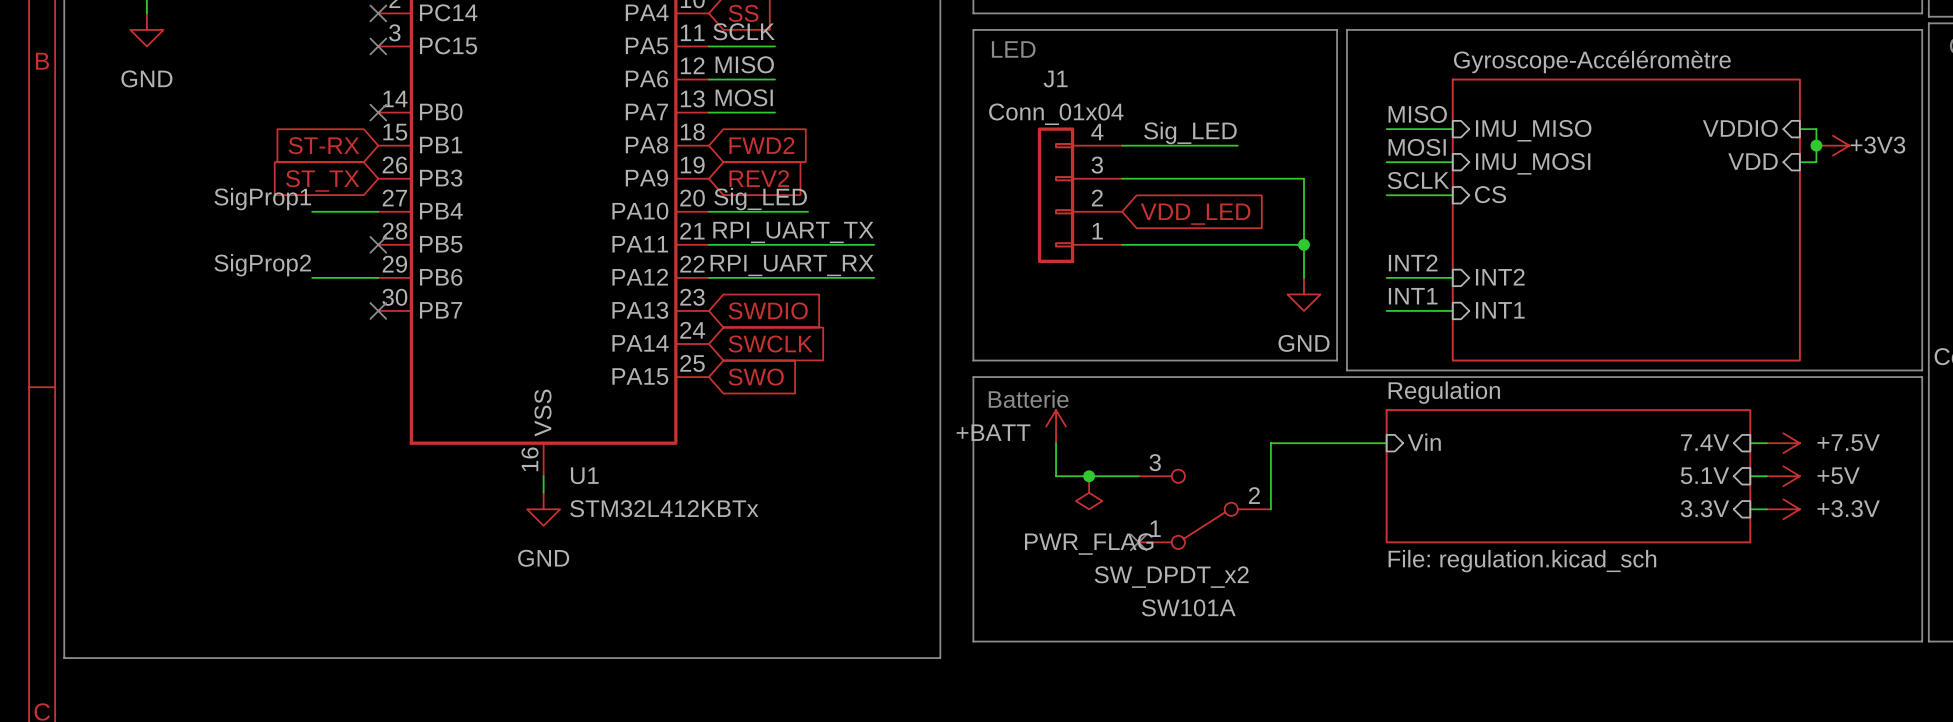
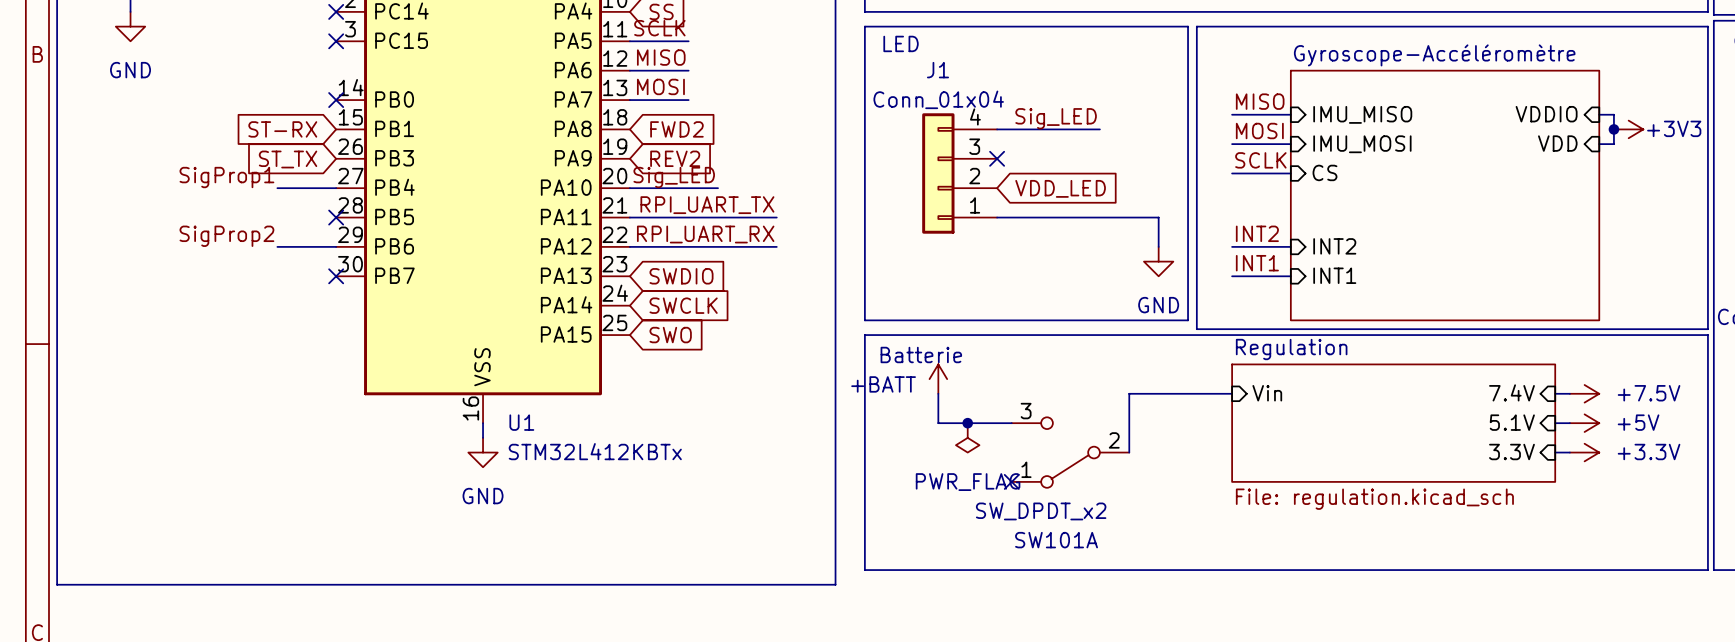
wire: (1122, 178) (1303, 178) (1303, 244) -> none
no-connect mark: none -> (997, 158)
junction: (1303, 244) -> none

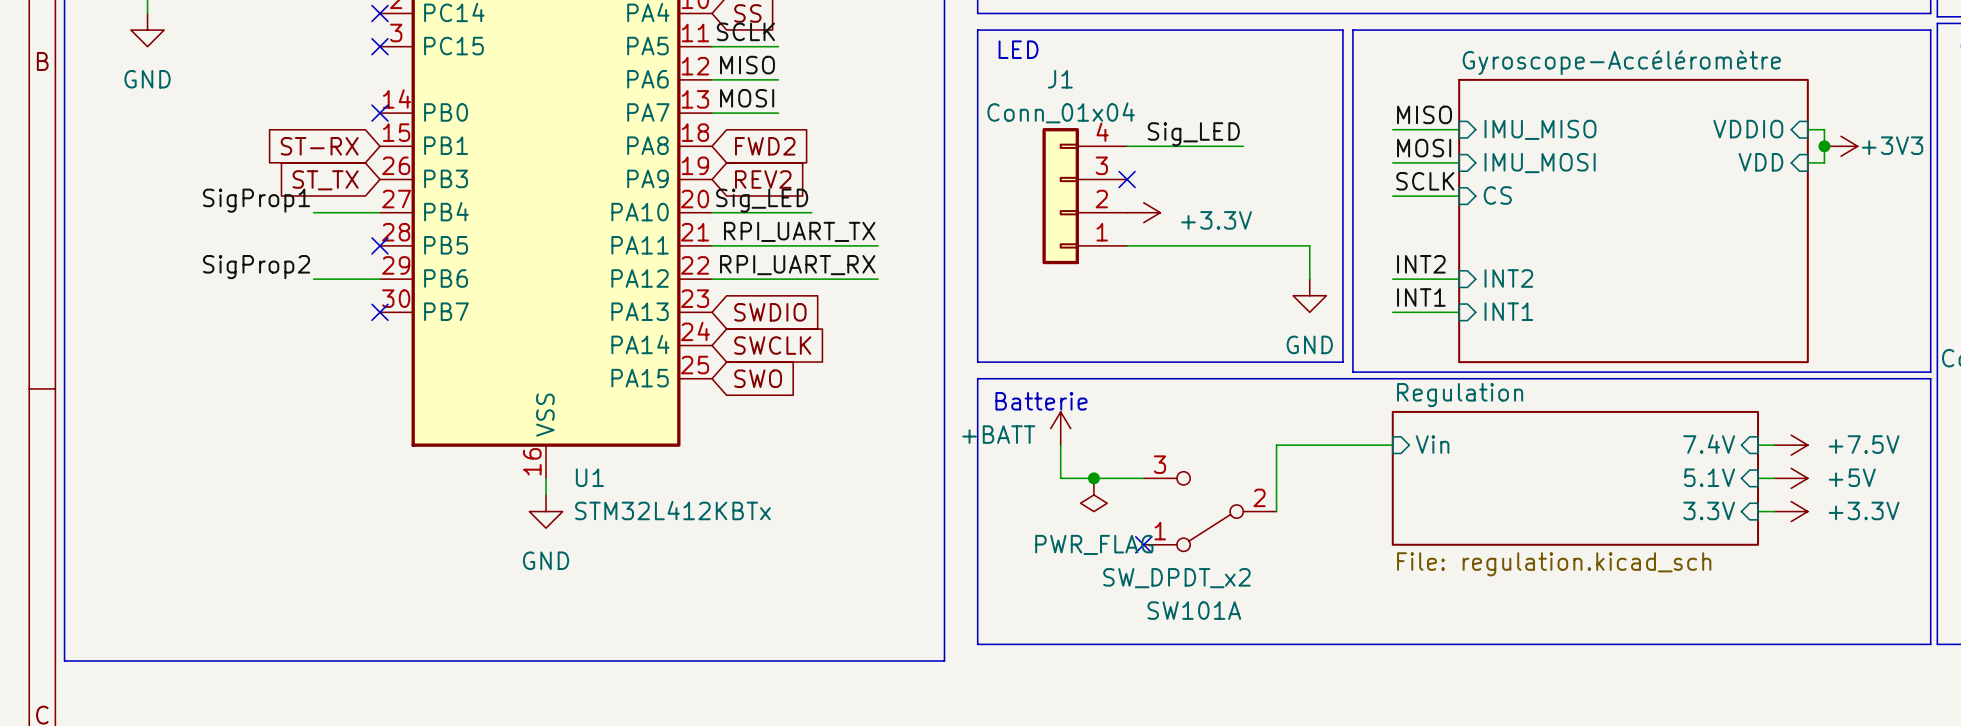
power symbol: none -> +3.3V (1143, 212)
global label: VDD_LED (1060, 188) -> none

